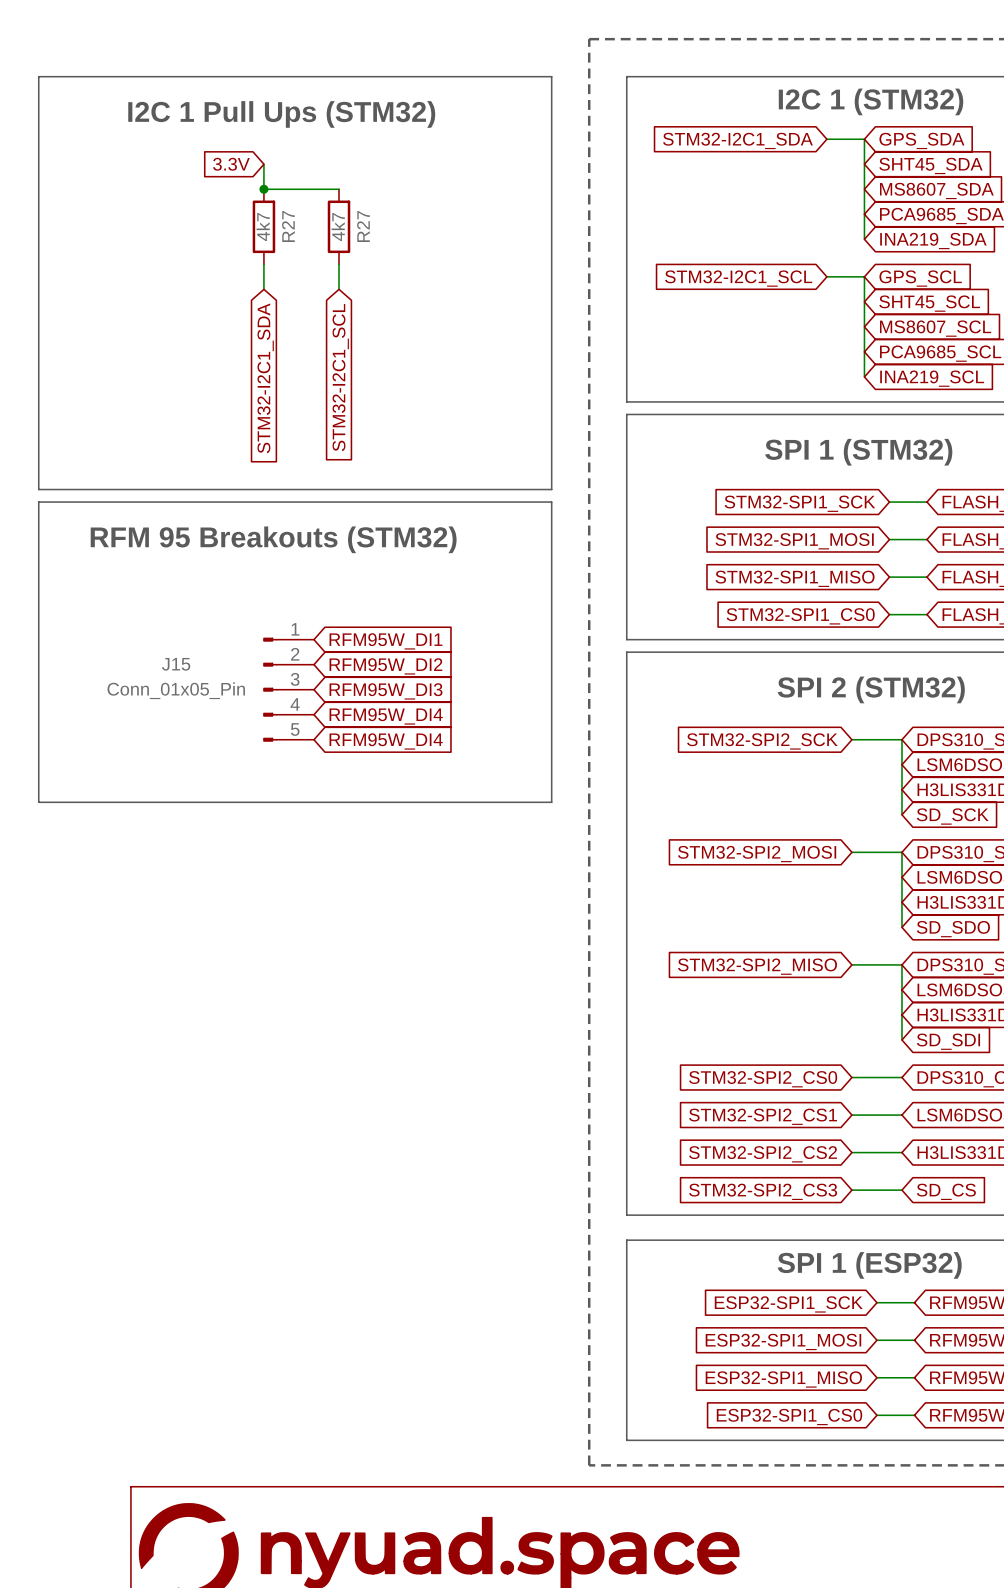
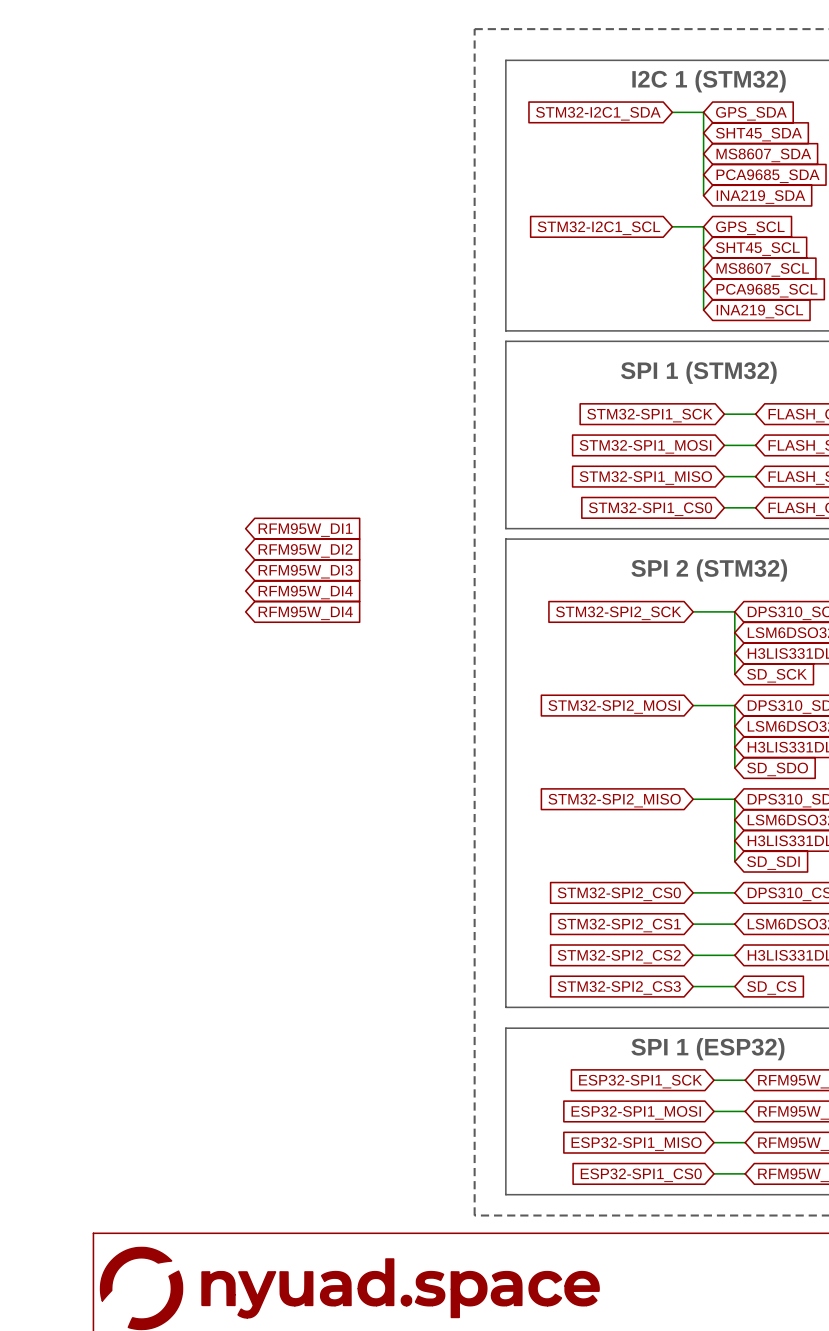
line: (38, 76) (38, 489) (551, 489) (551, 76) (38, 76) -> none
text: I2C 1 Pull Ups (STM32) (281, 114) -> none
global label: 3.3V (231, 164) -> none
wire: (263, 164) (263, 189) (339, 189) -> none
junction: (263, 189) -> none
R27: 4k7 (263, 226) -> none
R27: 4k7 (339, 226) -> none
wire: (263, 264) (263, 289) -> none
wire: (339, 264) (339, 289) -> none
global label: STM32-I2C1_SCL (340, 377) -> none
global label: STM32-I2C1_SDA (265, 378) -> none
line: (38, 502) (551, 502) (551, 802) (38, 802) (38, 502) -> none
text: RFM 95 Breakouts (STM32) (273, 539) -> none
J15: Conn_01x05_Pin (288, 689) -> none

